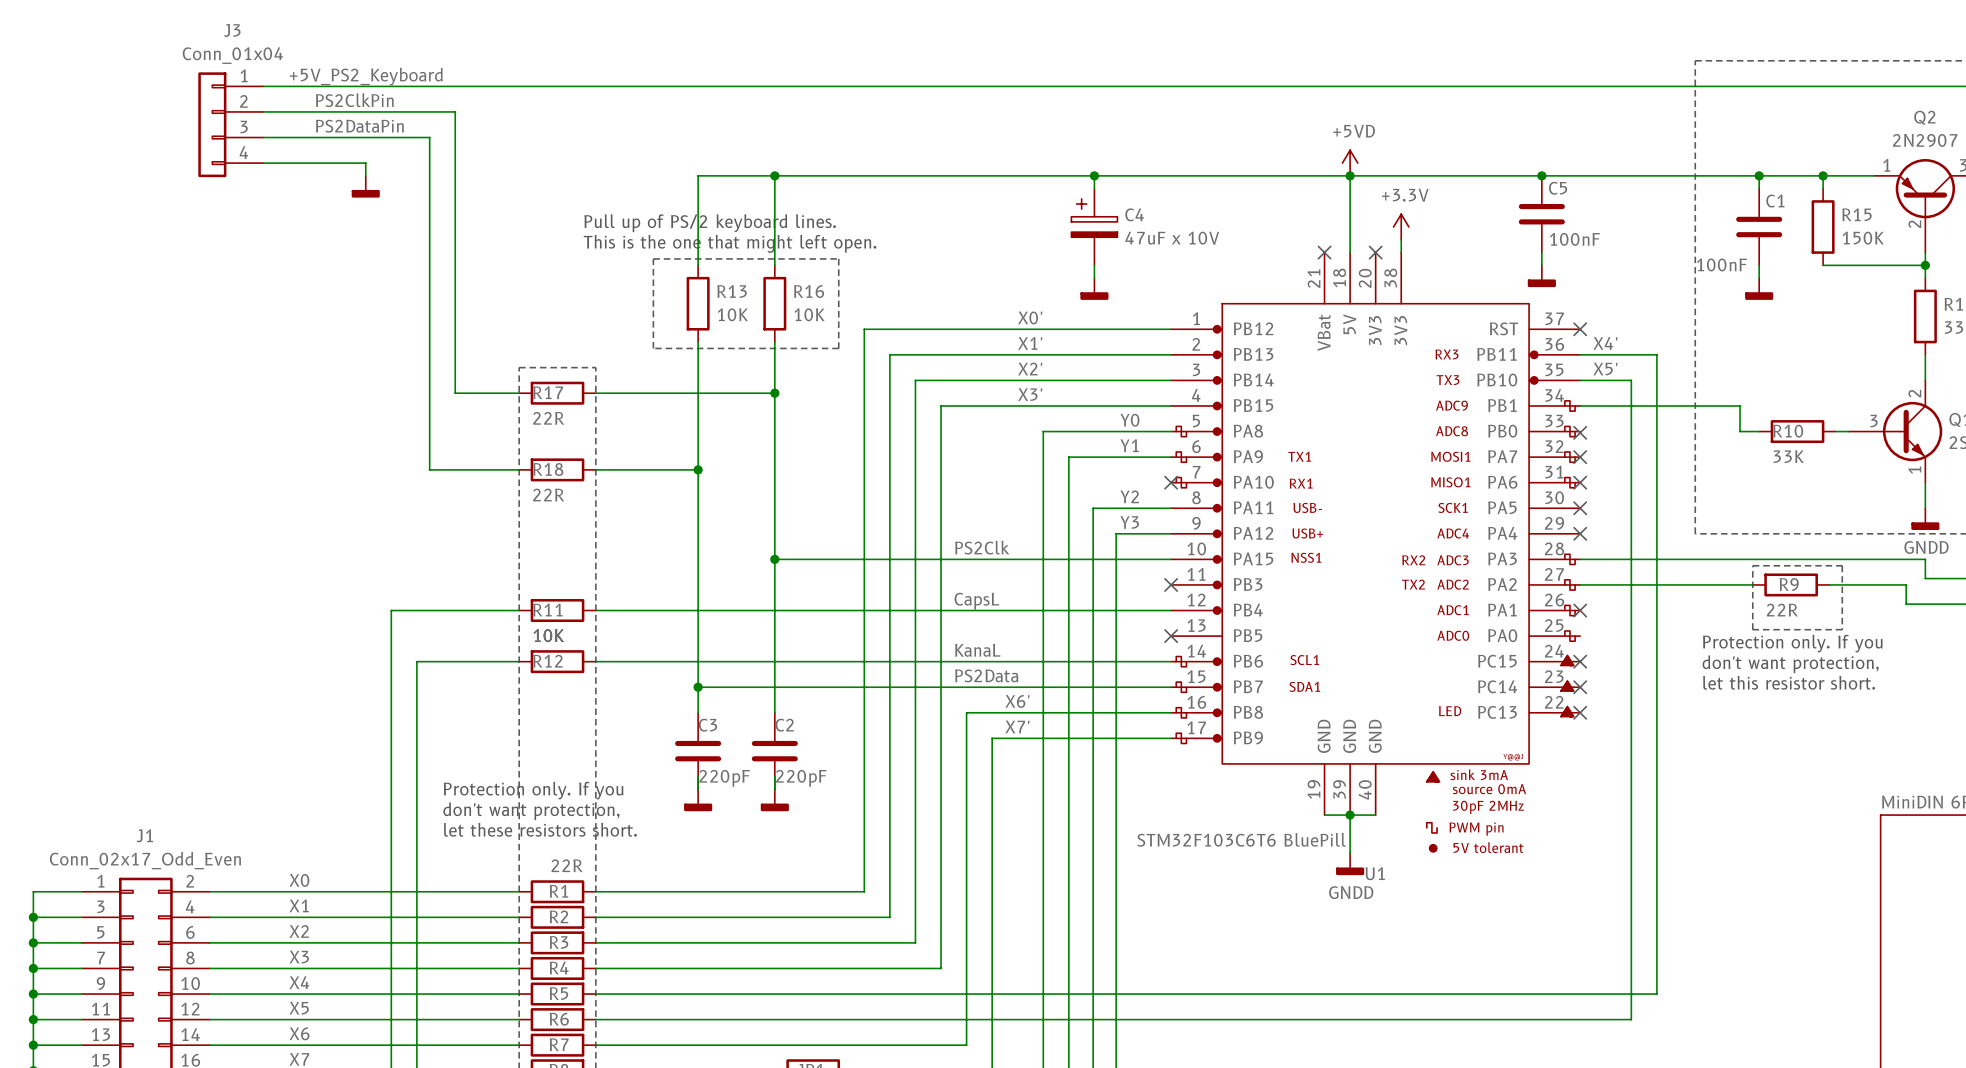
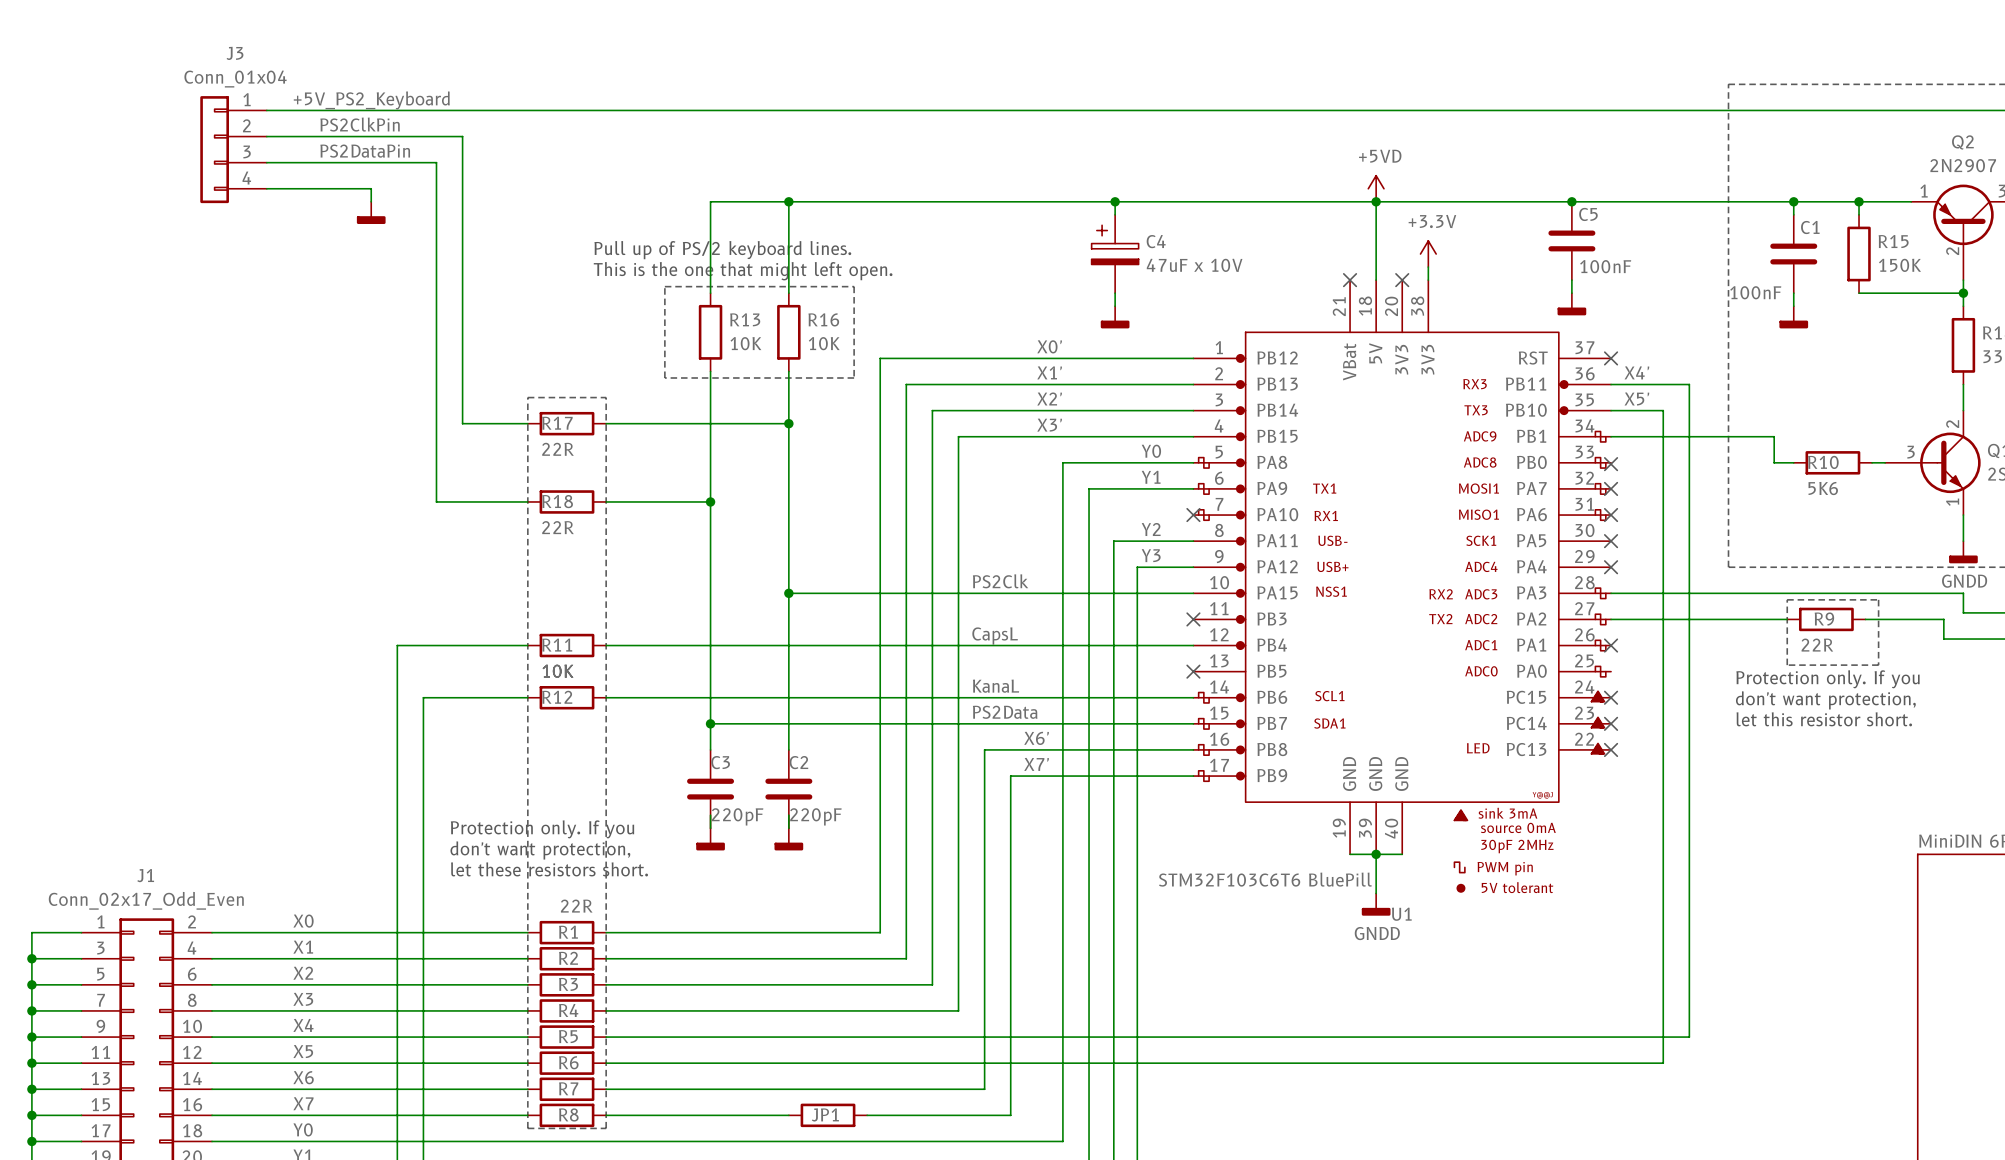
R10 value: 33K (1788, 456) -> 5K6 (1823, 488)

